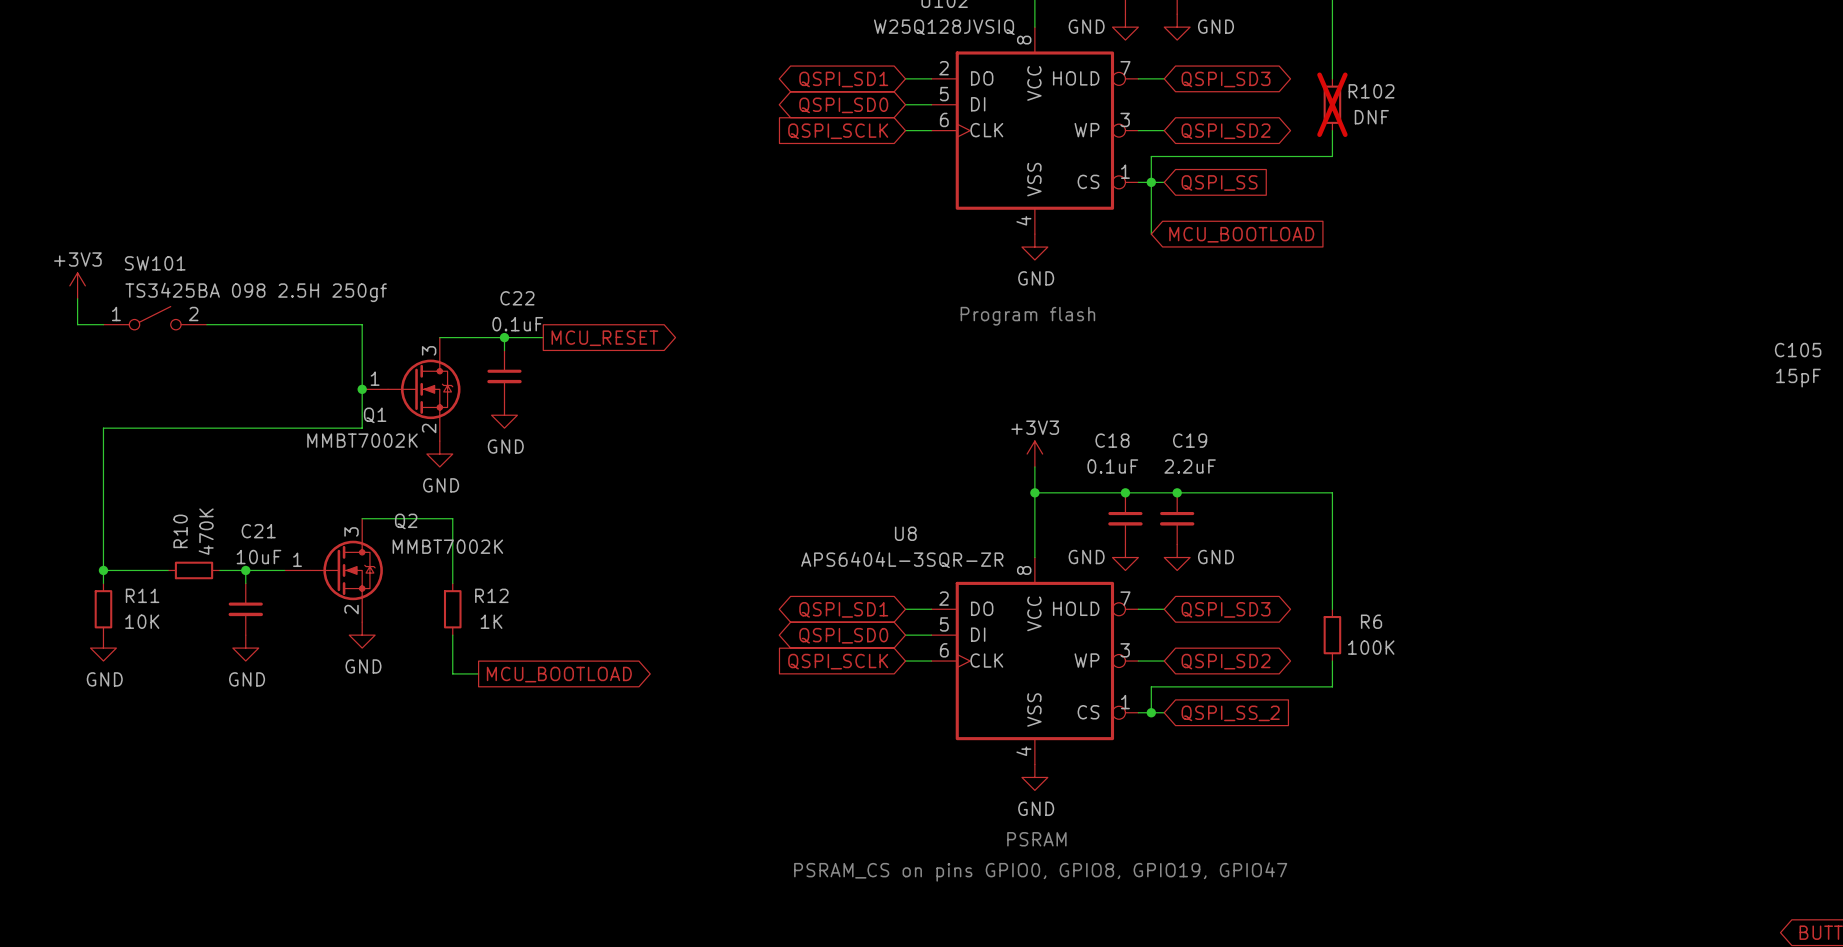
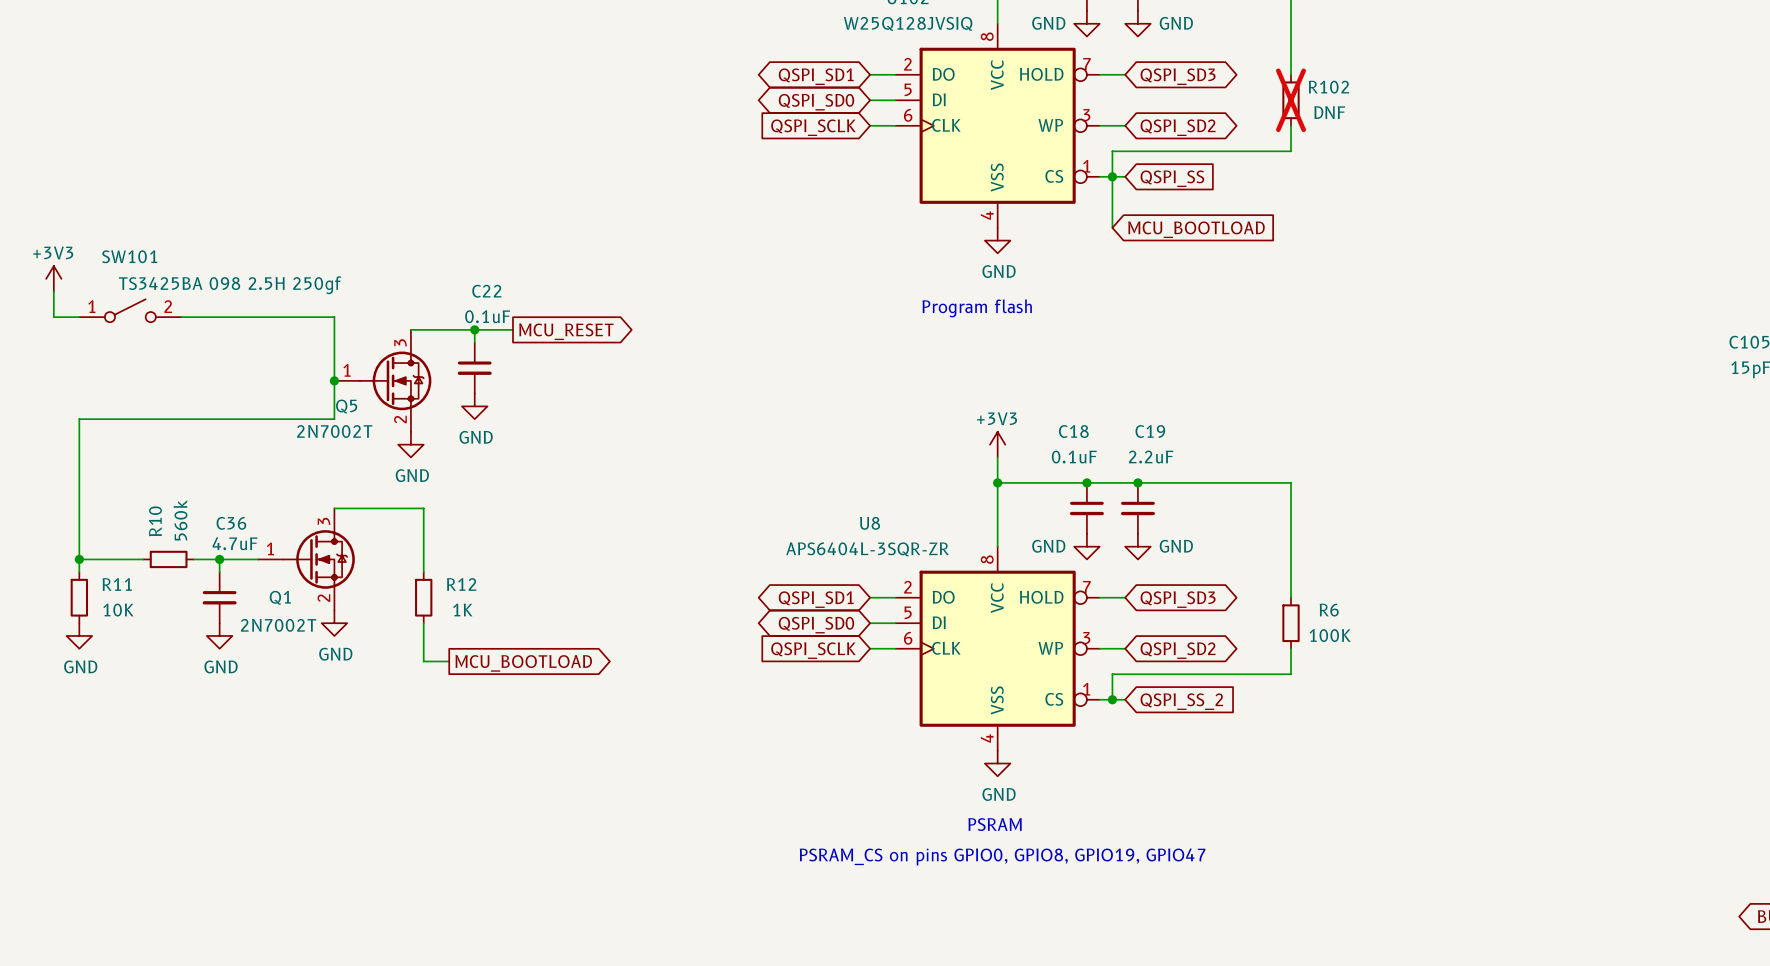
Q1 name: Q1 (375, 415) -> Q5 (346, 406)
Q1 value: MMBT7002K (362, 440) -> 2N7002T (334, 431)
Q2 name: Q2 (406, 521) -> Q1 (280, 597)
R10 value: 470K (206, 531) -> 560k (180, 520)
C21 name: C21 (258, 531) -> C36 (231, 523)
Q2 value: MMBT7002K (447, 546) -> 2N7002T (278, 625)
C21 value: 10uF (259, 557) -> 4.7uF (235, 543)

